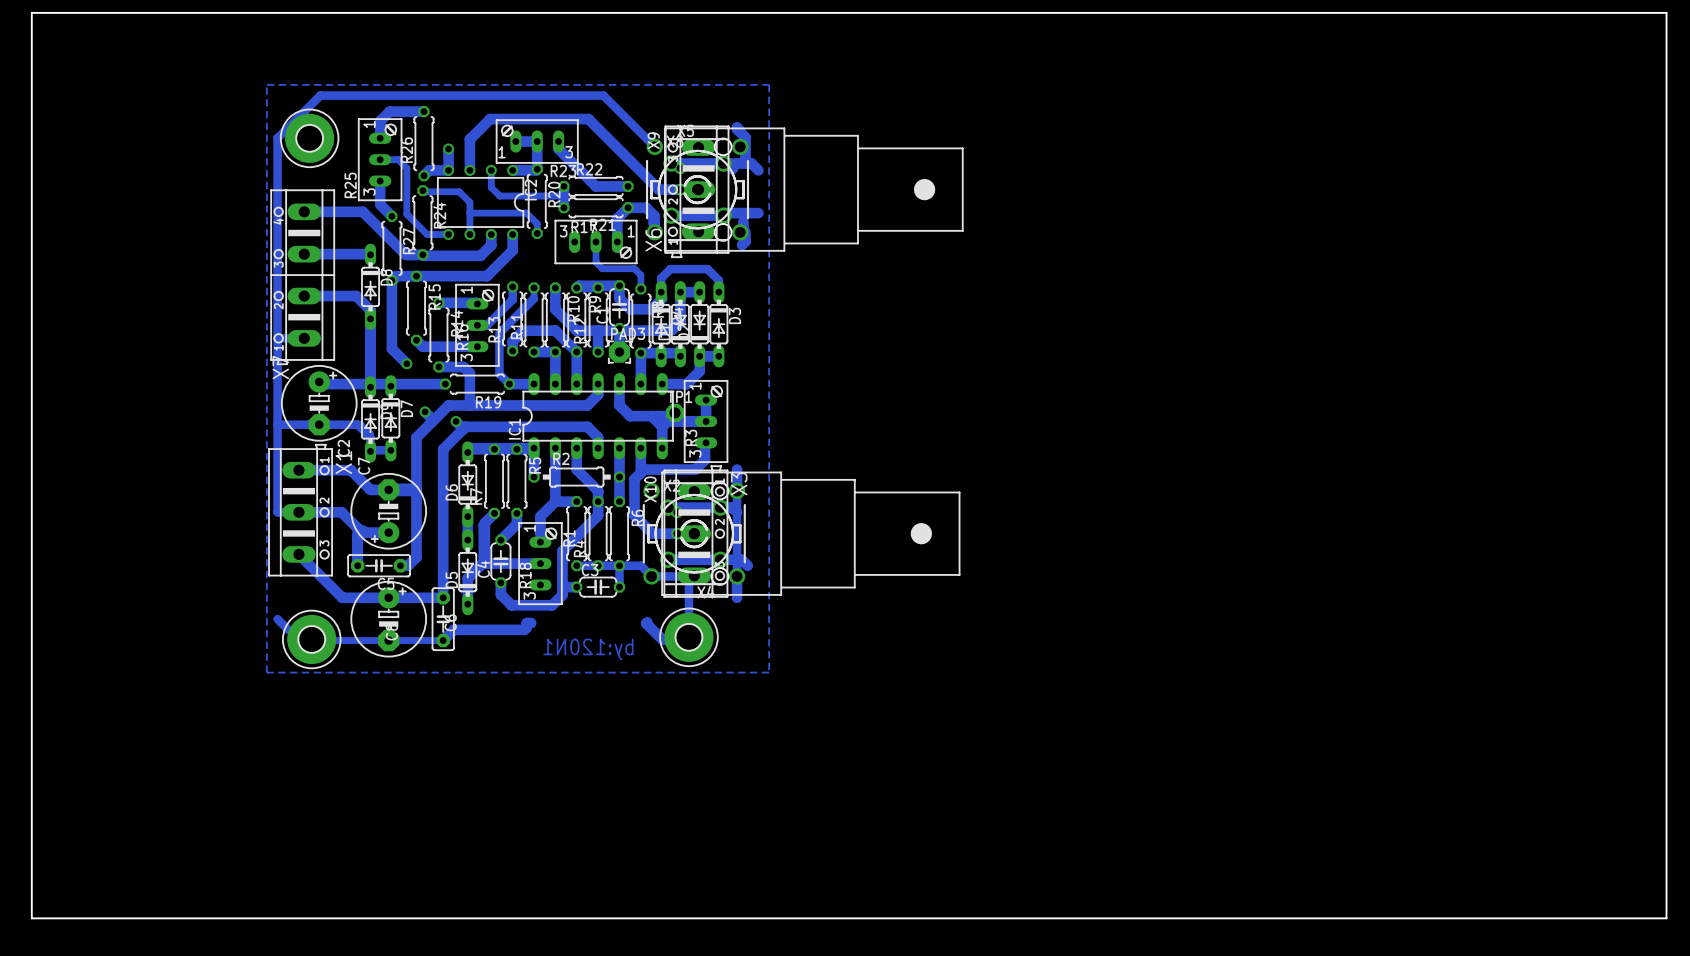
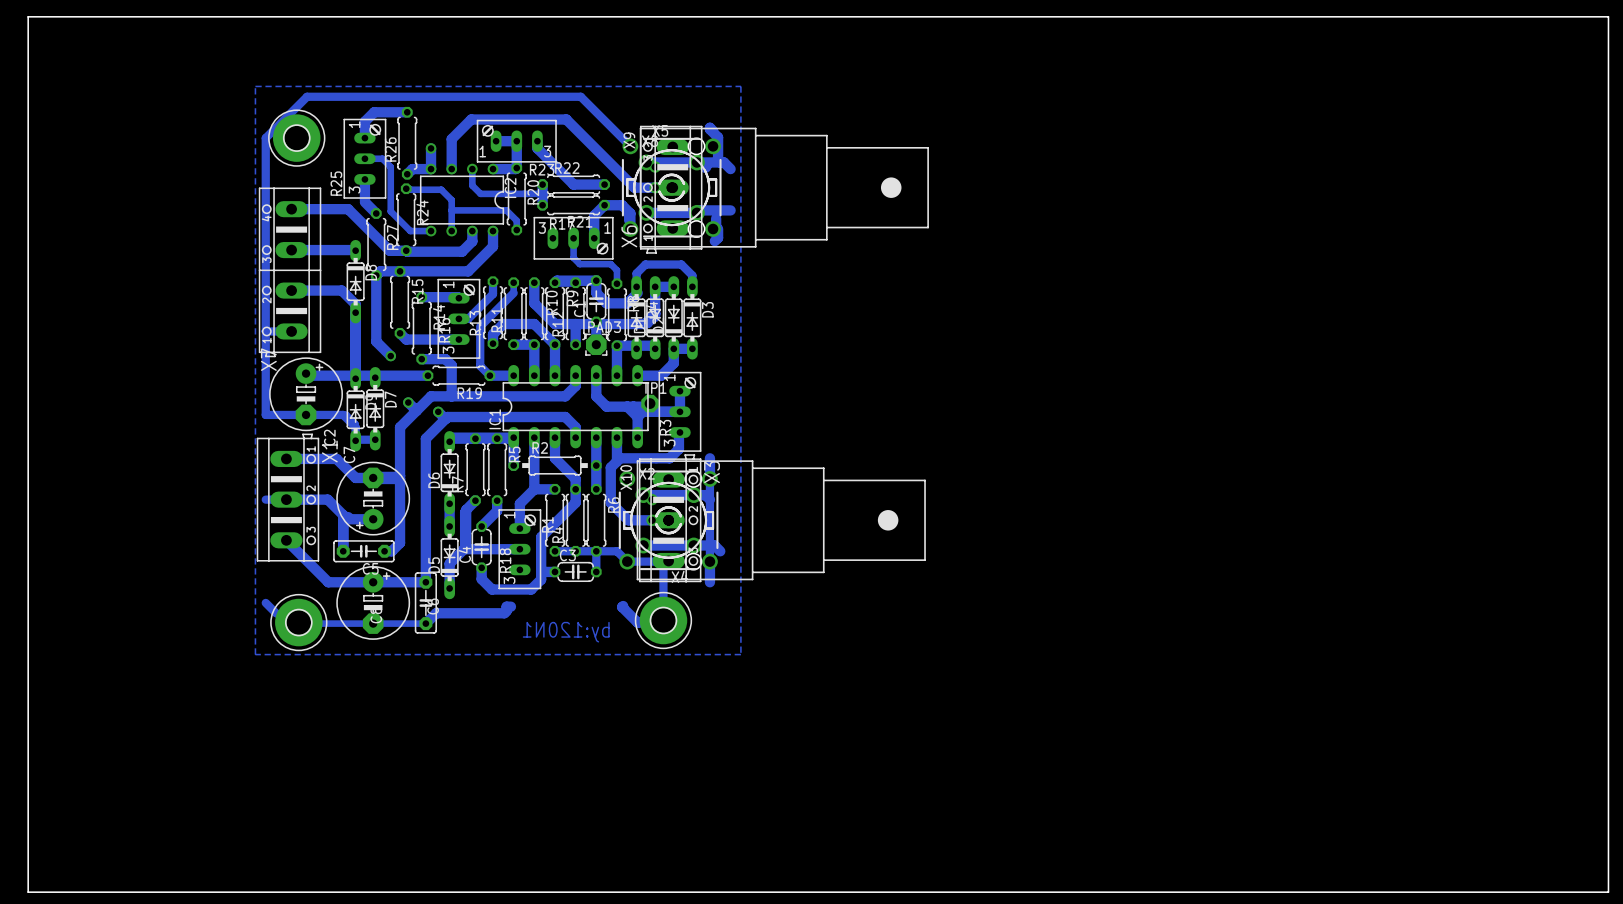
bottom track: (277, 424) (277, 512) -> none

